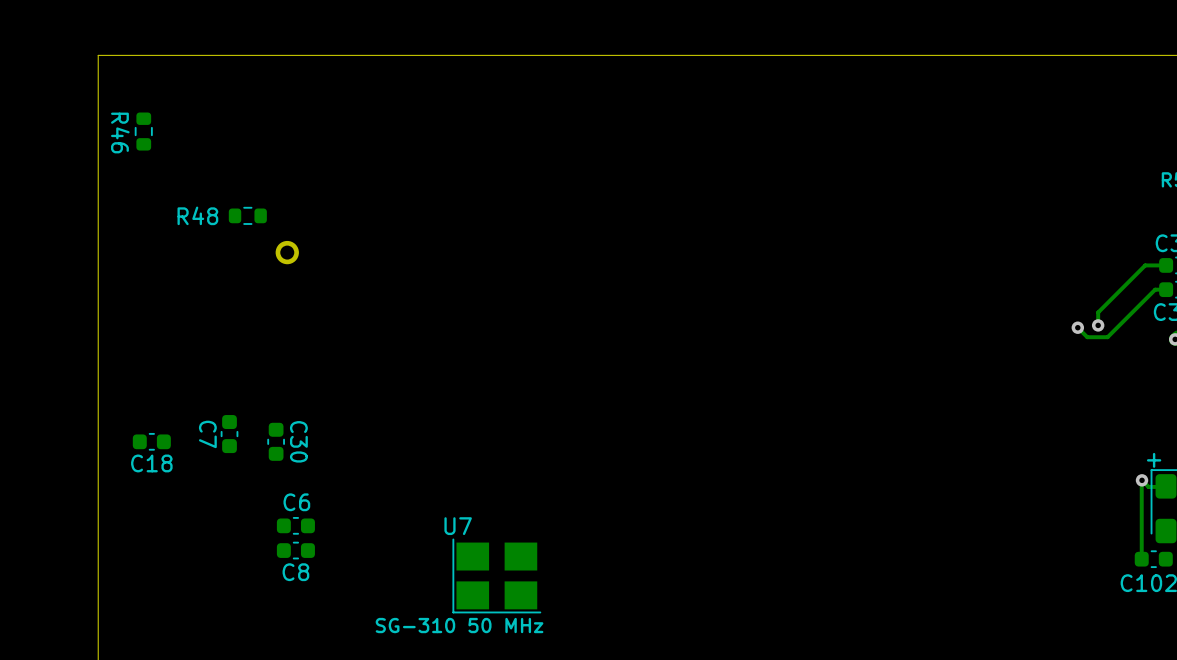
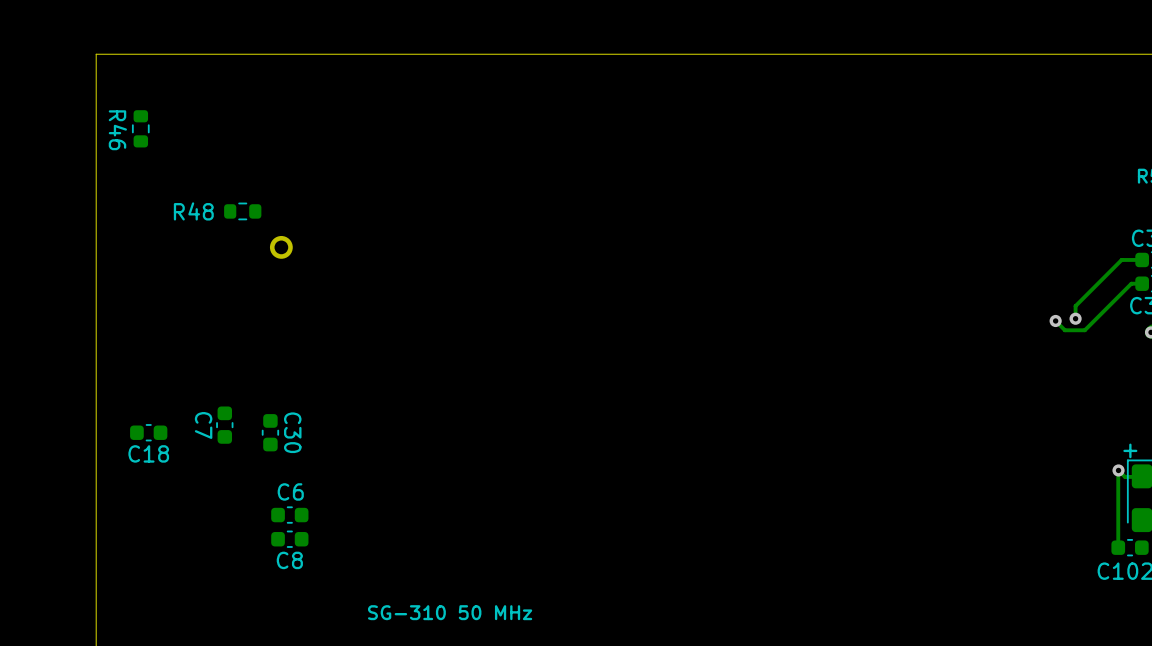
U7: (496, 575) -> none

